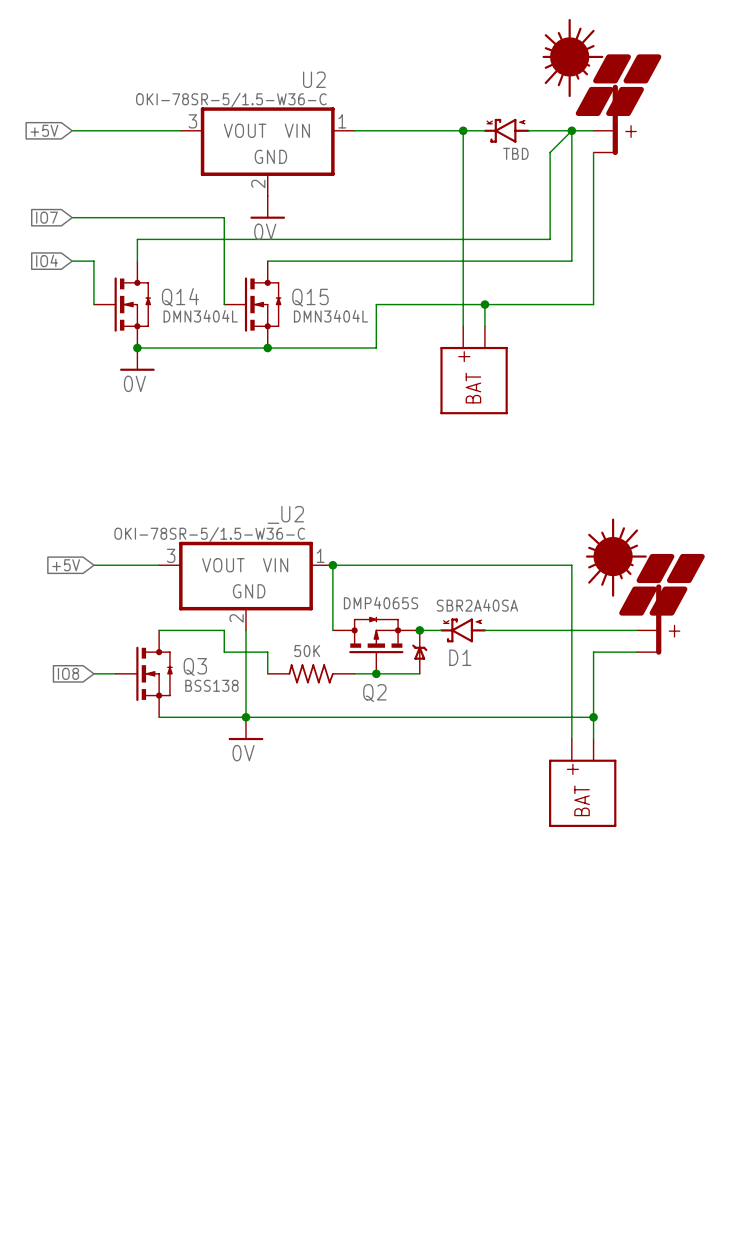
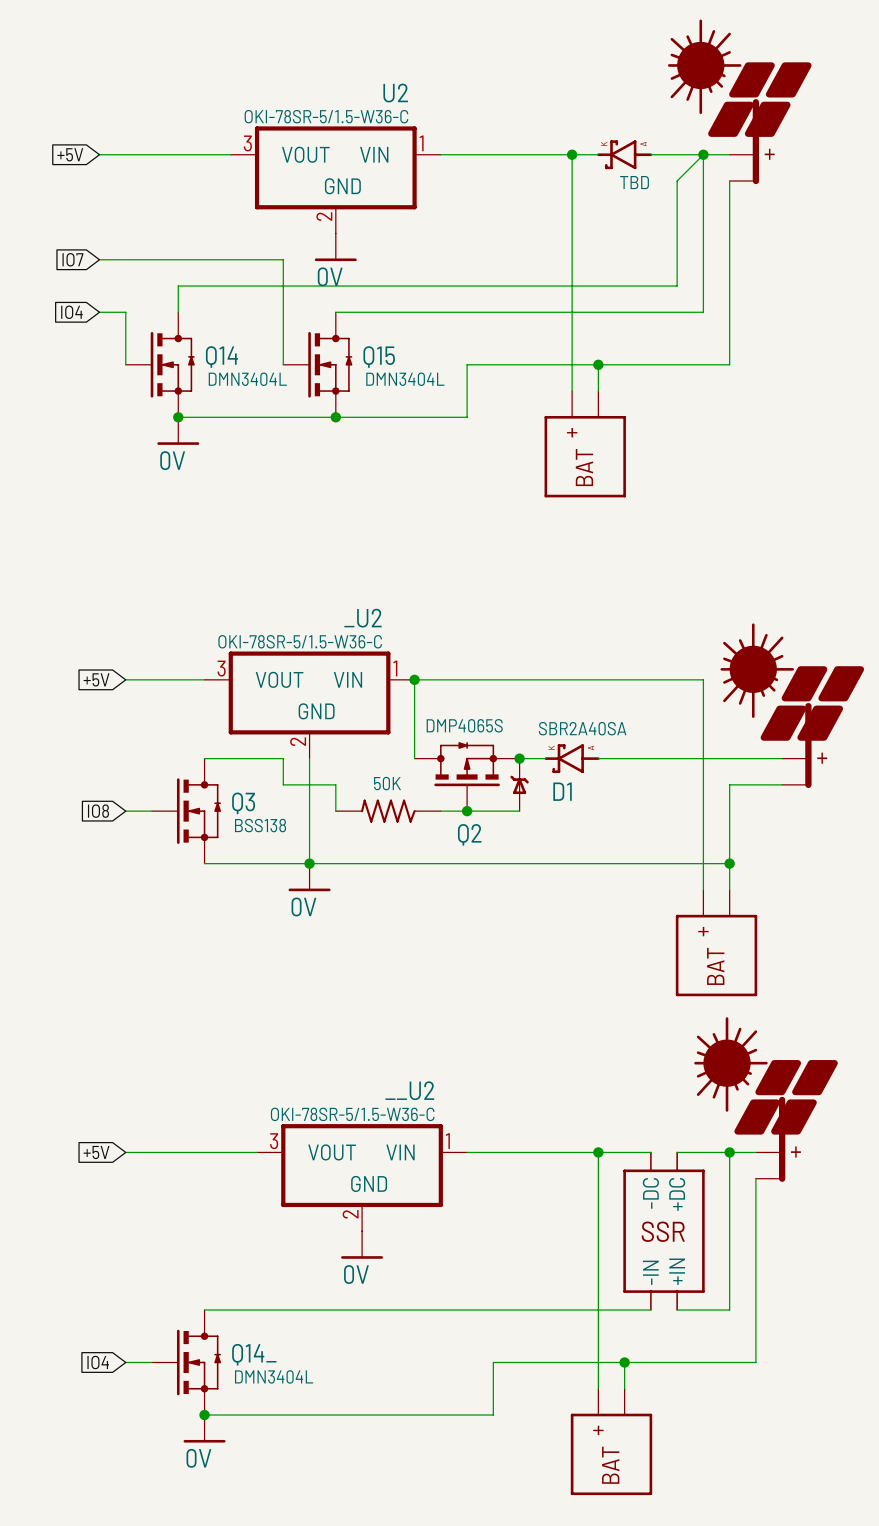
part: none -> (766, 1099)
global label: none -> +5V (96, 1152)
wire: none -> (125, 1152) (257, 1152)
wire: none -> (467, 1152) (650, 1152)
wire: none -> (598, 1152) (598, 1388)
junction: none -> (598, 1152)
wire: none -> (677, 1152) (755, 1152)
wire: none -> (729, 1152) (729, 1309) (677, 1309)
junction: none -> (729, 1152)
__U2: none -> OKI-78SR-5/1.5-W36-C (362, 1177)
wire: none -> (755, 1178) (755, 1362) (493, 1362) (493, 1415) (204, 1415)
part: none -> (664, 1231)
power symbol: none -> 0V (362, 1245)
wire: none -> (204, 1309) (650, 1309)
global label: none -> IO4 (98, 1362)
wire: none -> (125, 1362) (152, 1362)
Q14_: none -> DMN3404L (186, 1362)
wire: none -> (624, 1362) (624, 1388)
junction: none -> (624, 1362)
junction: none -> (204, 1415)
power symbol: none -> 0V (204, 1428)
part: none -> (611, 1441)

